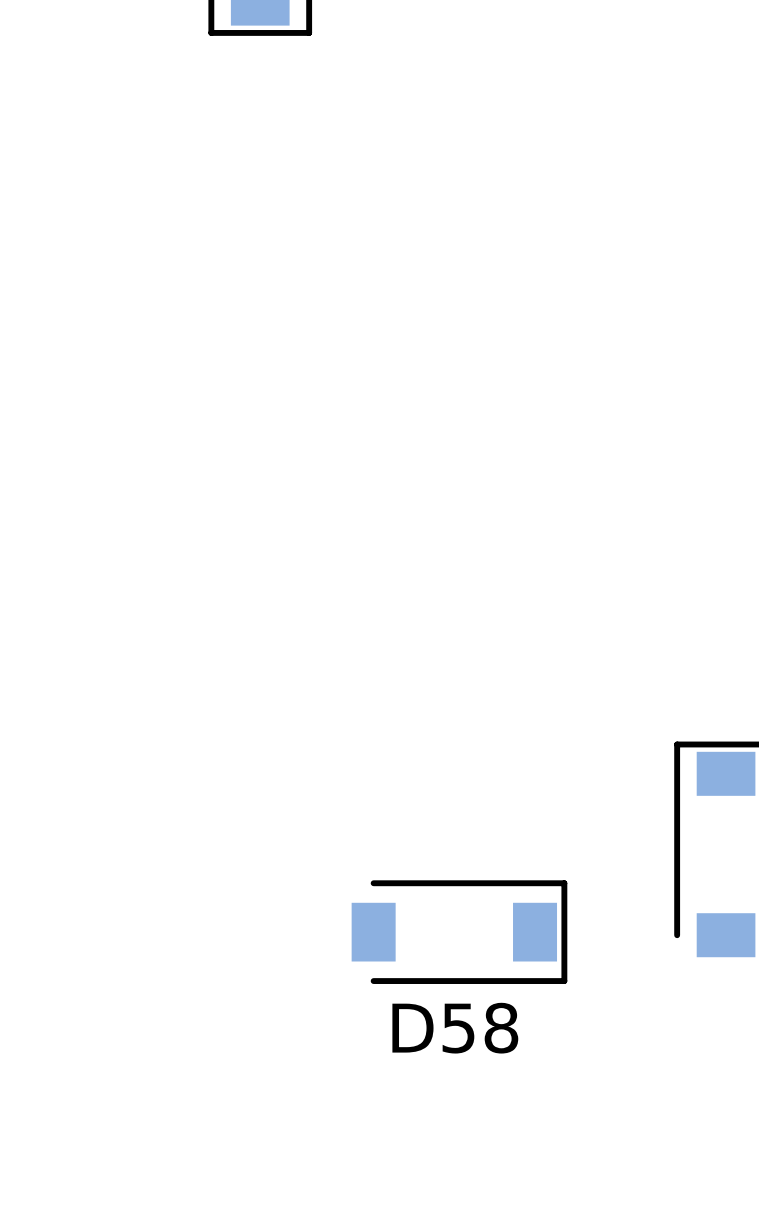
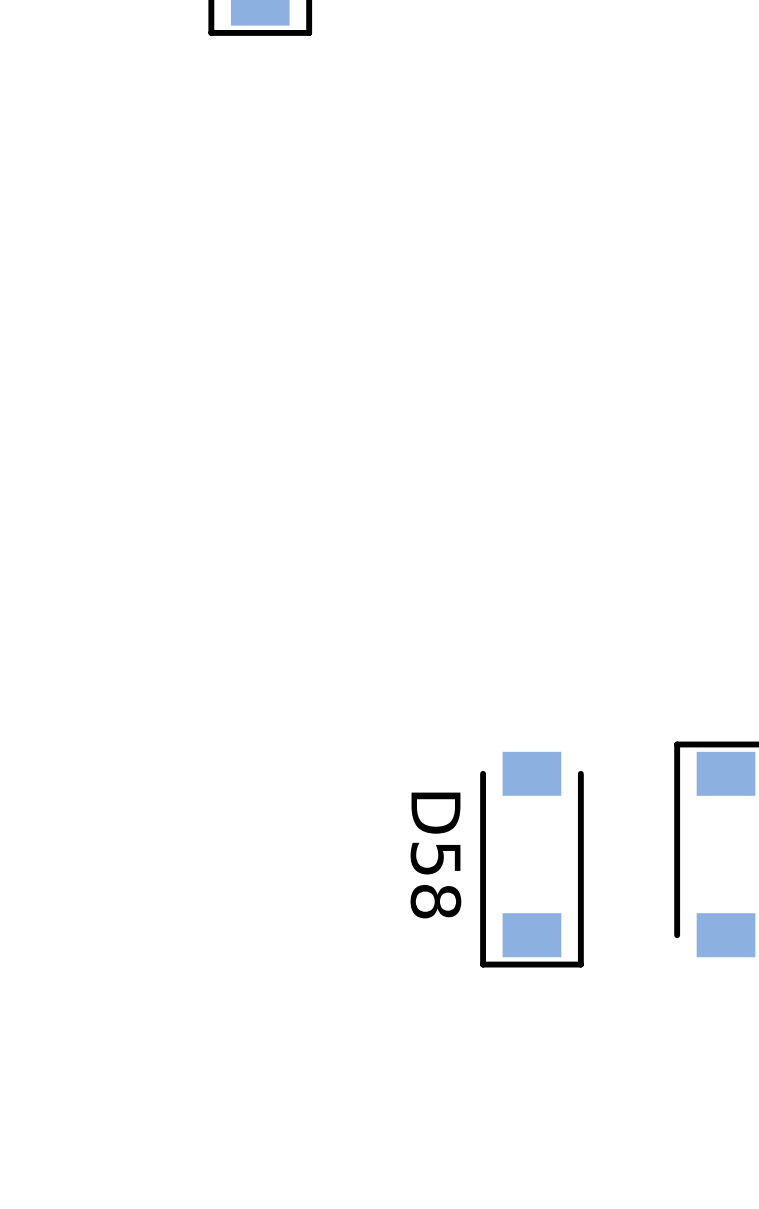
D58 rotation: 0° (459, 932) -> 90° clockwise (531, 859)

